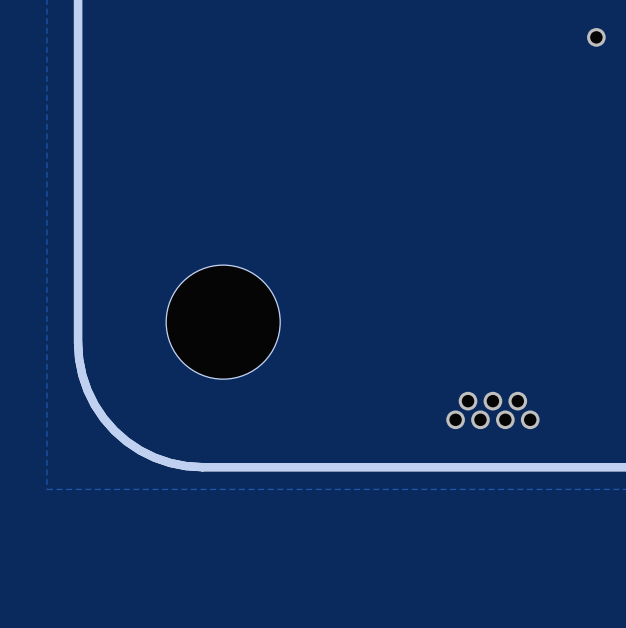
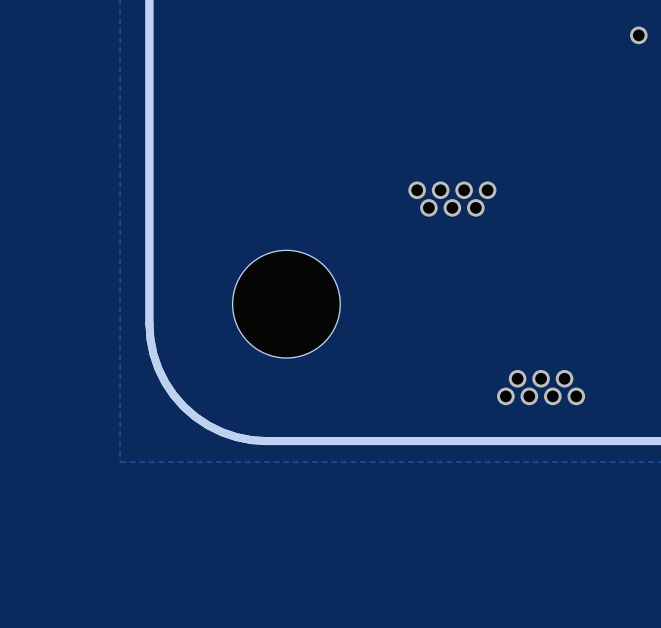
via: none -> (417, 190)
via: none -> (440, 190)
via: none -> (464, 190)
via: none -> (487, 190)
via: none -> (428, 207)
via: none -> (452, 207)
via: none -> (475, 207)

